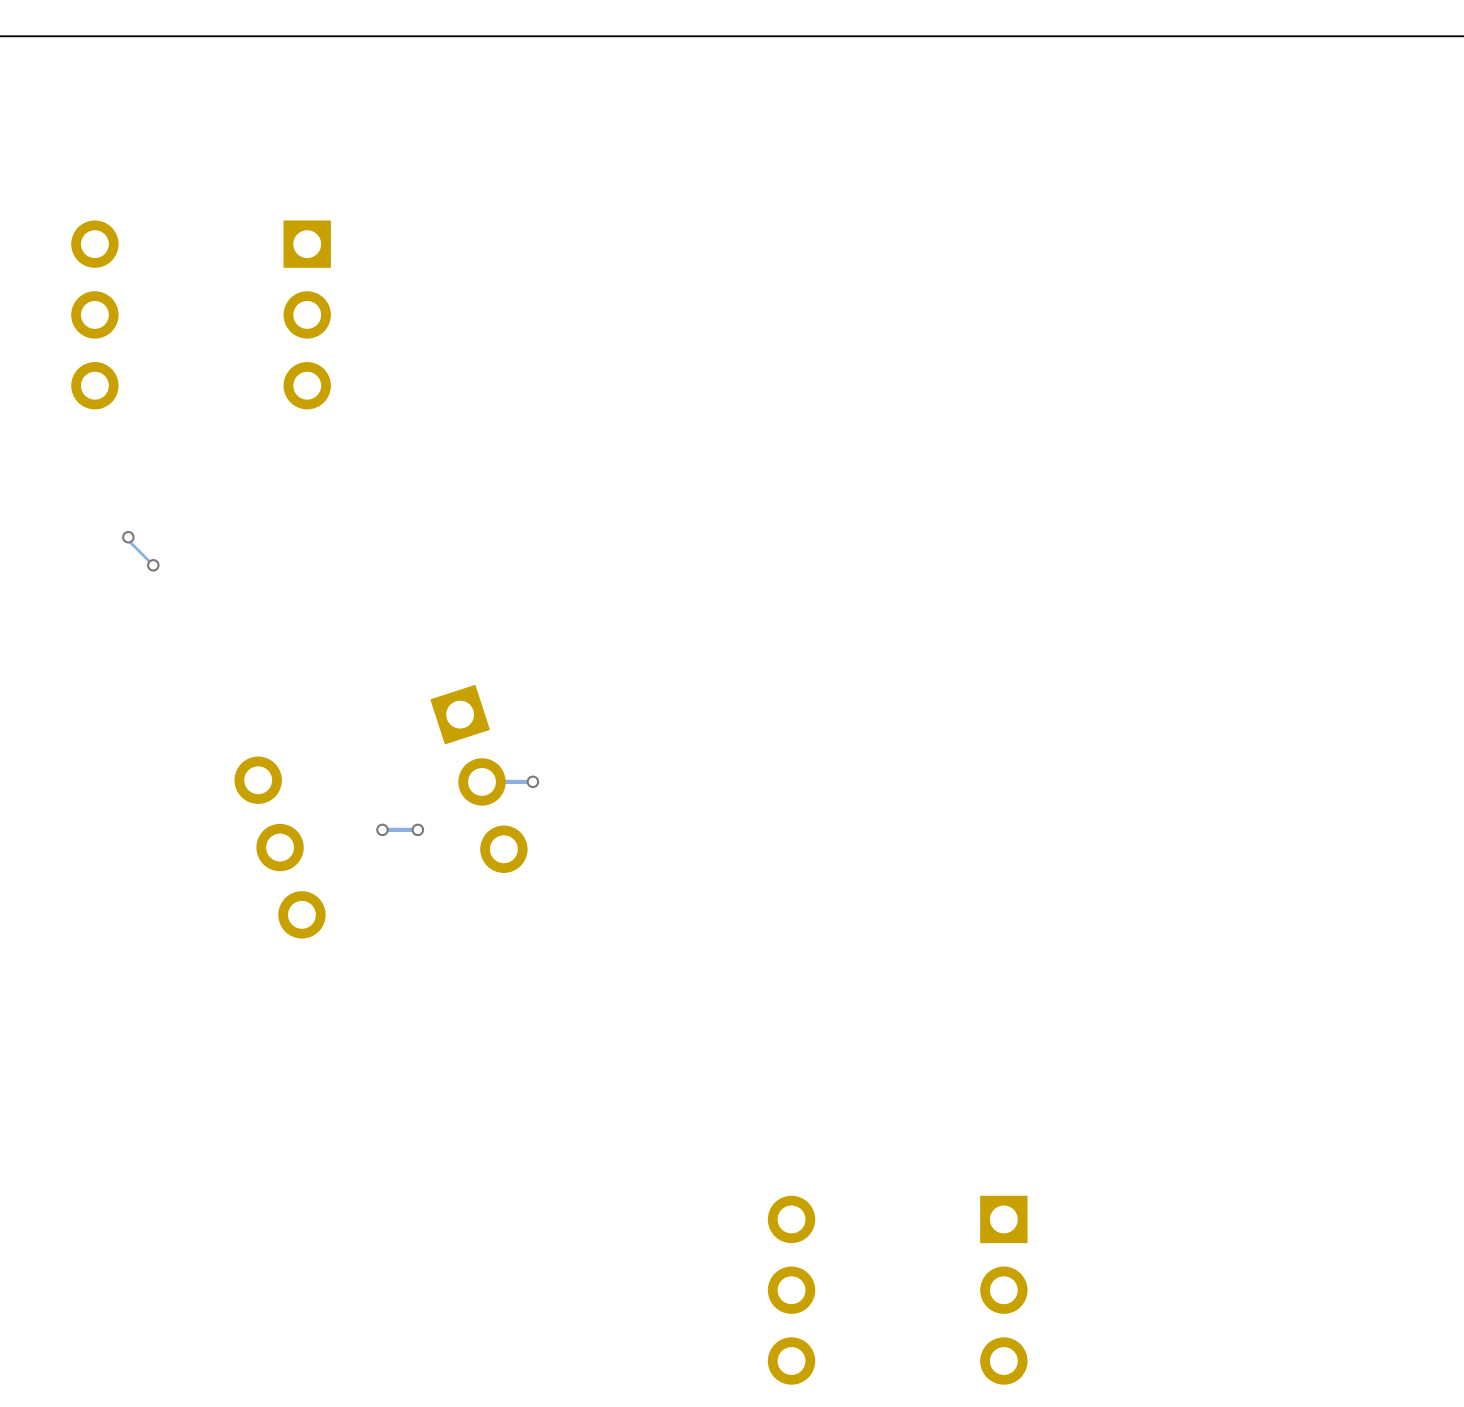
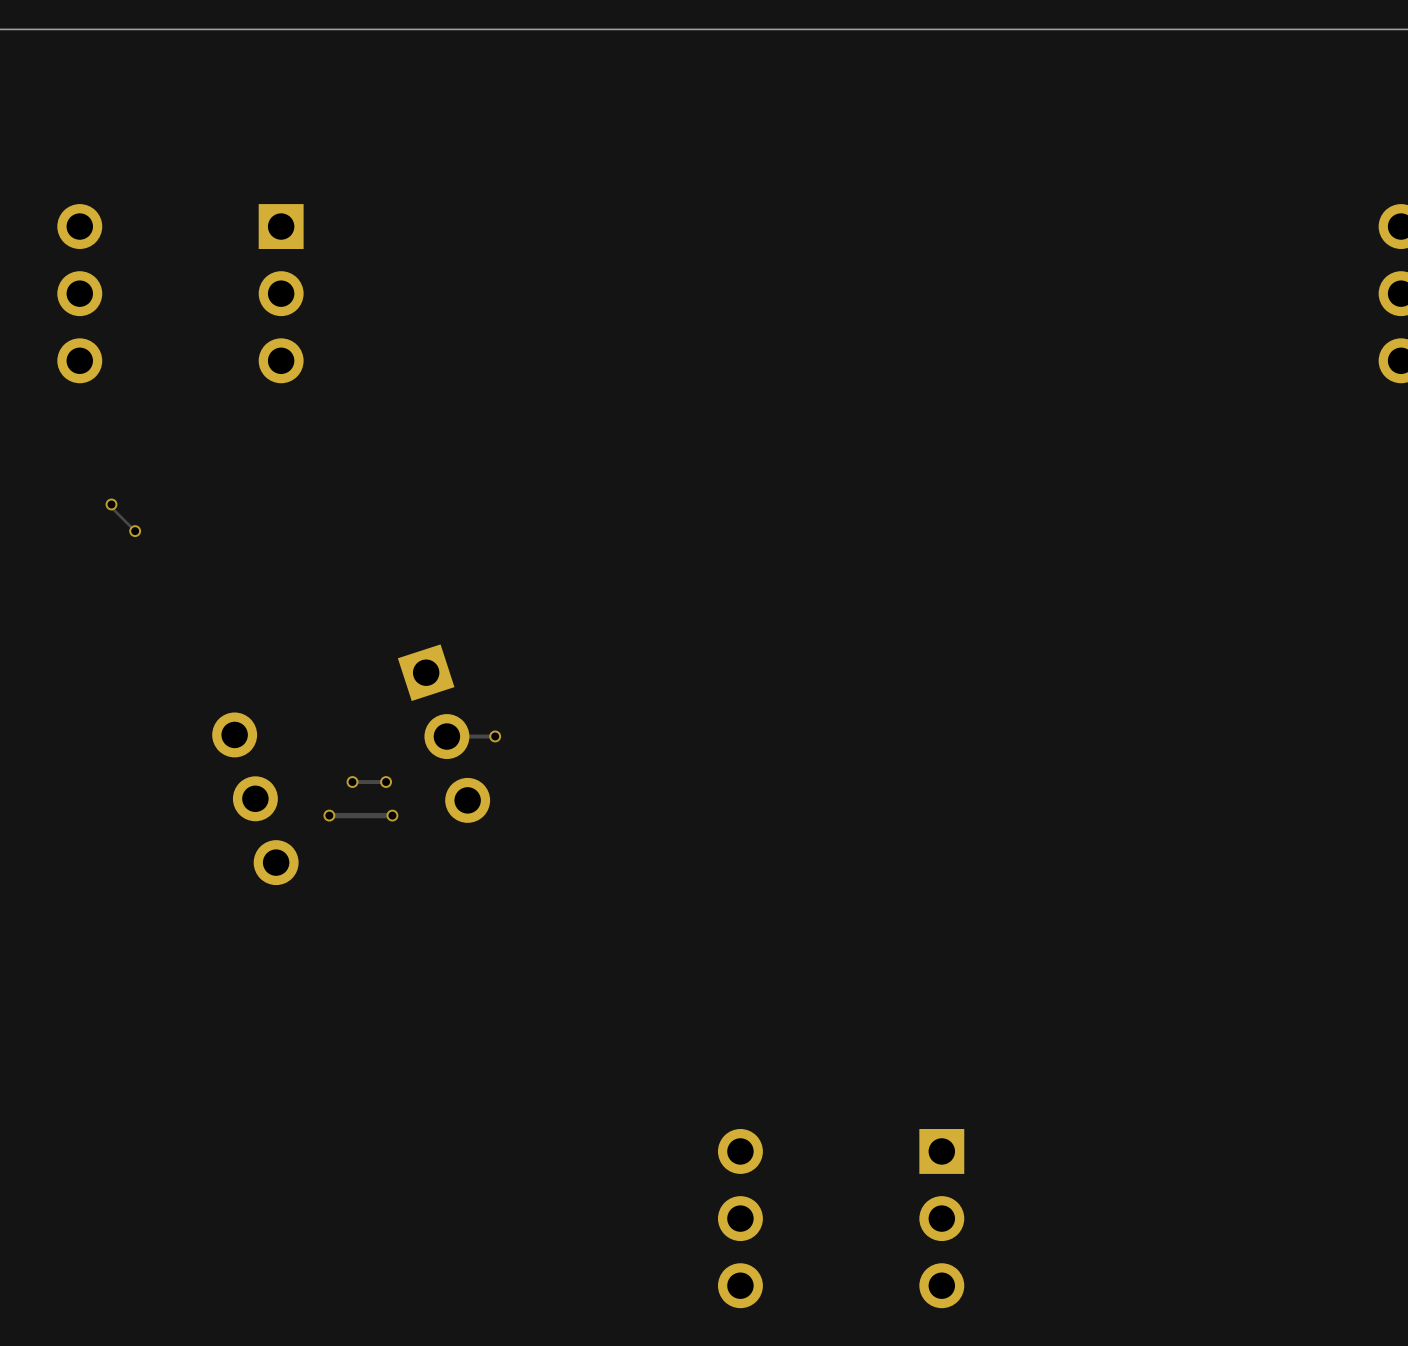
via: none -> (329, 815)
track: none -> (392, 815) (329, 815)
via: none -> (392, 815)

